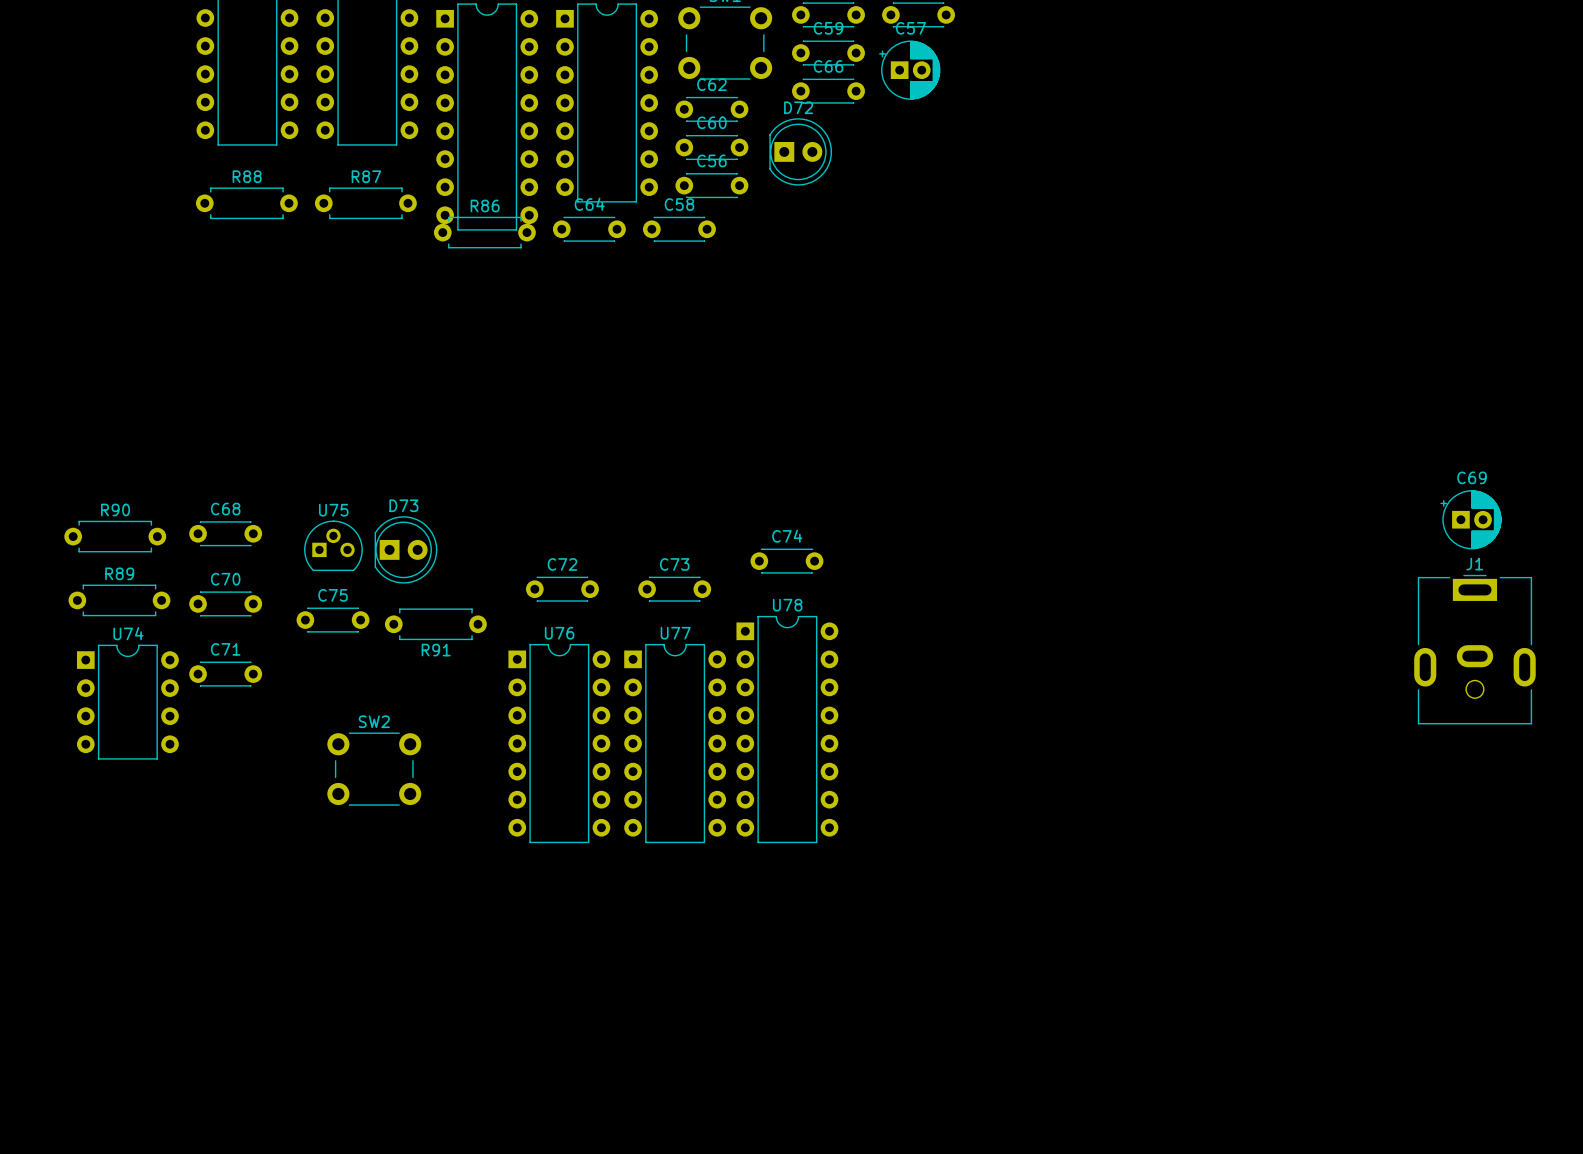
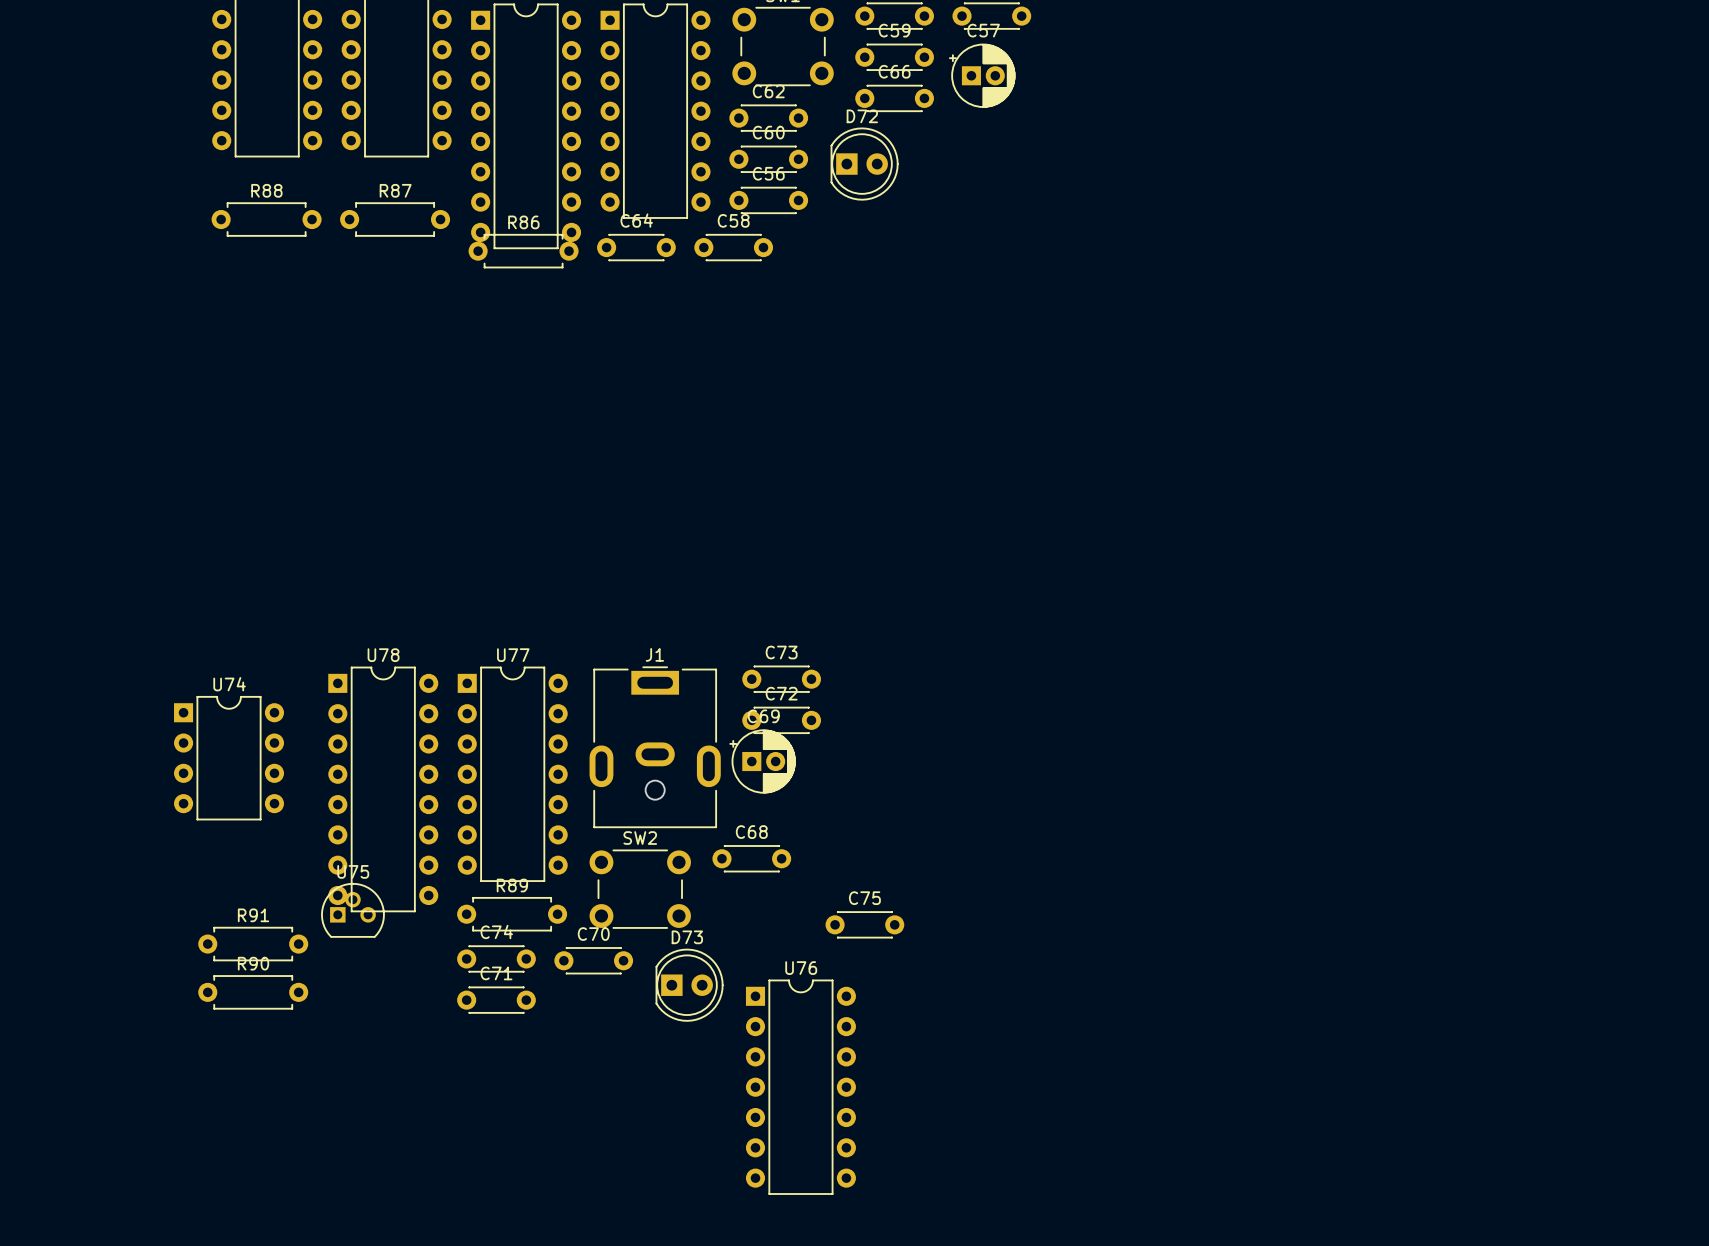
C69 position: (1470, 519) -> (762, 761)
C68 position: (225, 533) -> (751, 858)
R90 position: (115, 536) -> (253, 992)
U75 position: (333, 545) -> (352, 910)
D73 position: (406, 549) -> (689, 985)
C74 position: (786, 561) -> (496, 958)
C72 position: (562, 589) -> (781, 720)
C73 position: (674, 589) -> (781, 679)
R89 position: (119, 600) -> (512, 914)
C70 position: (225, 603) -> (593, 960)
C75 position: (333, 620) -> (864, 924)
R91 position: (435, 624) -> (253, 944)
J1 position: (1474, 649) -> (655, 747)
R91 name position: R91 (436, 650) -> R91 (253, 915)
C71 position: (225, 674) -> (496, 1000)
U74 position: (127, 702) -> (229, 758)
U78 position: (787, 729) -> (383, 789)
U76 position: (559, 743) -> (800, 1087)
U77 position: (675, 743) -> (512, 774)
SW2 position: (374, 769) -> (640, 889)

